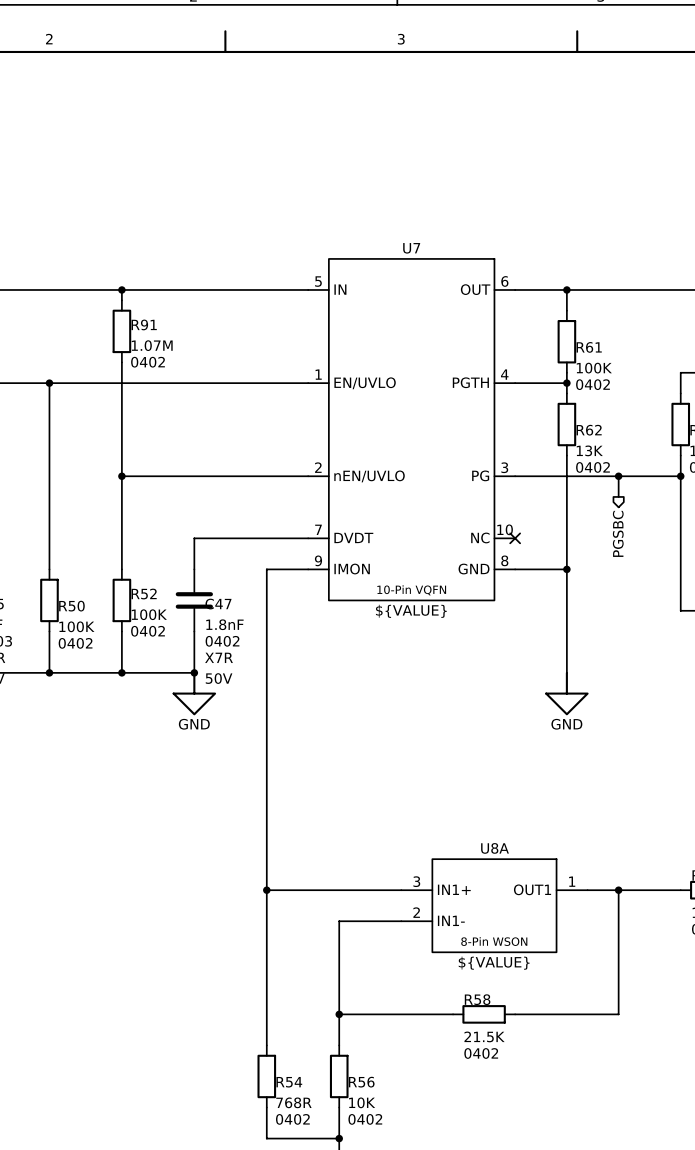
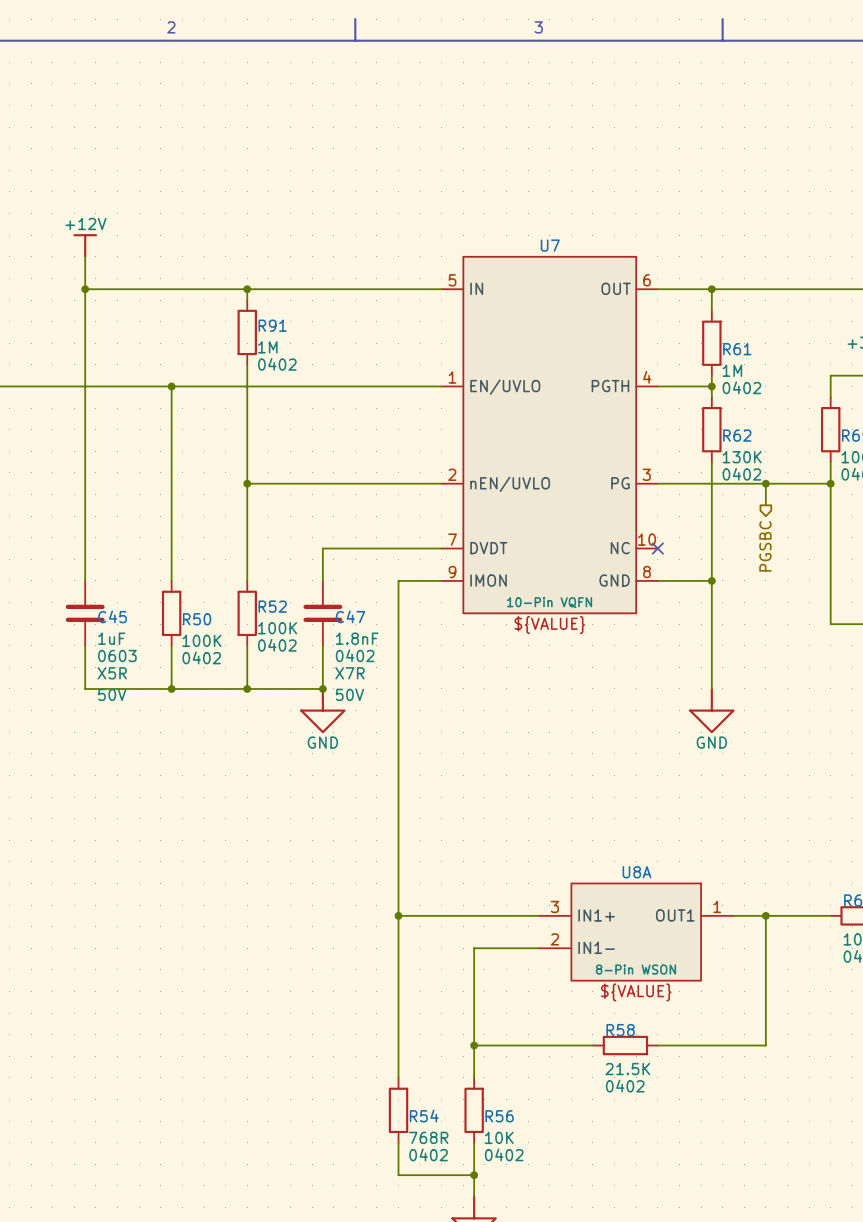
R91 value: 1.07M (152, 345) -> 1M (267, 347)
R61 value: 100K (594, 368) -> 1M (732, 370)
R62 value: 13K (589, 450) -> 130K (742, 457)

